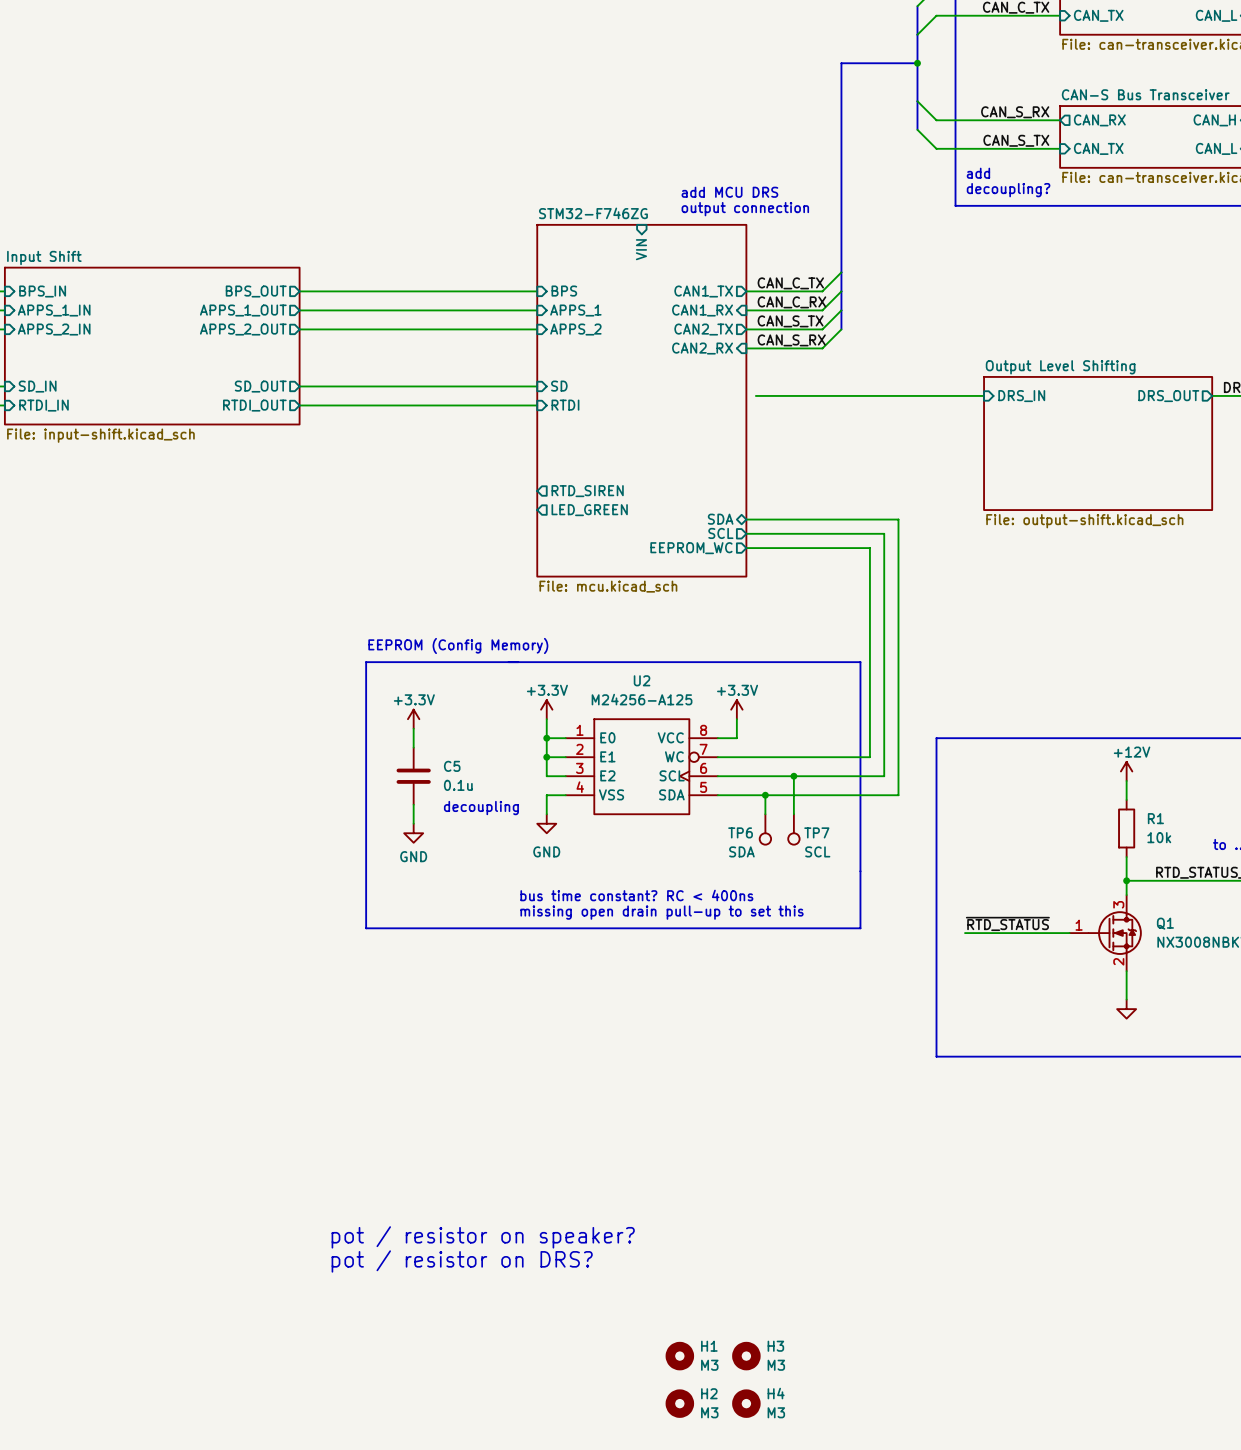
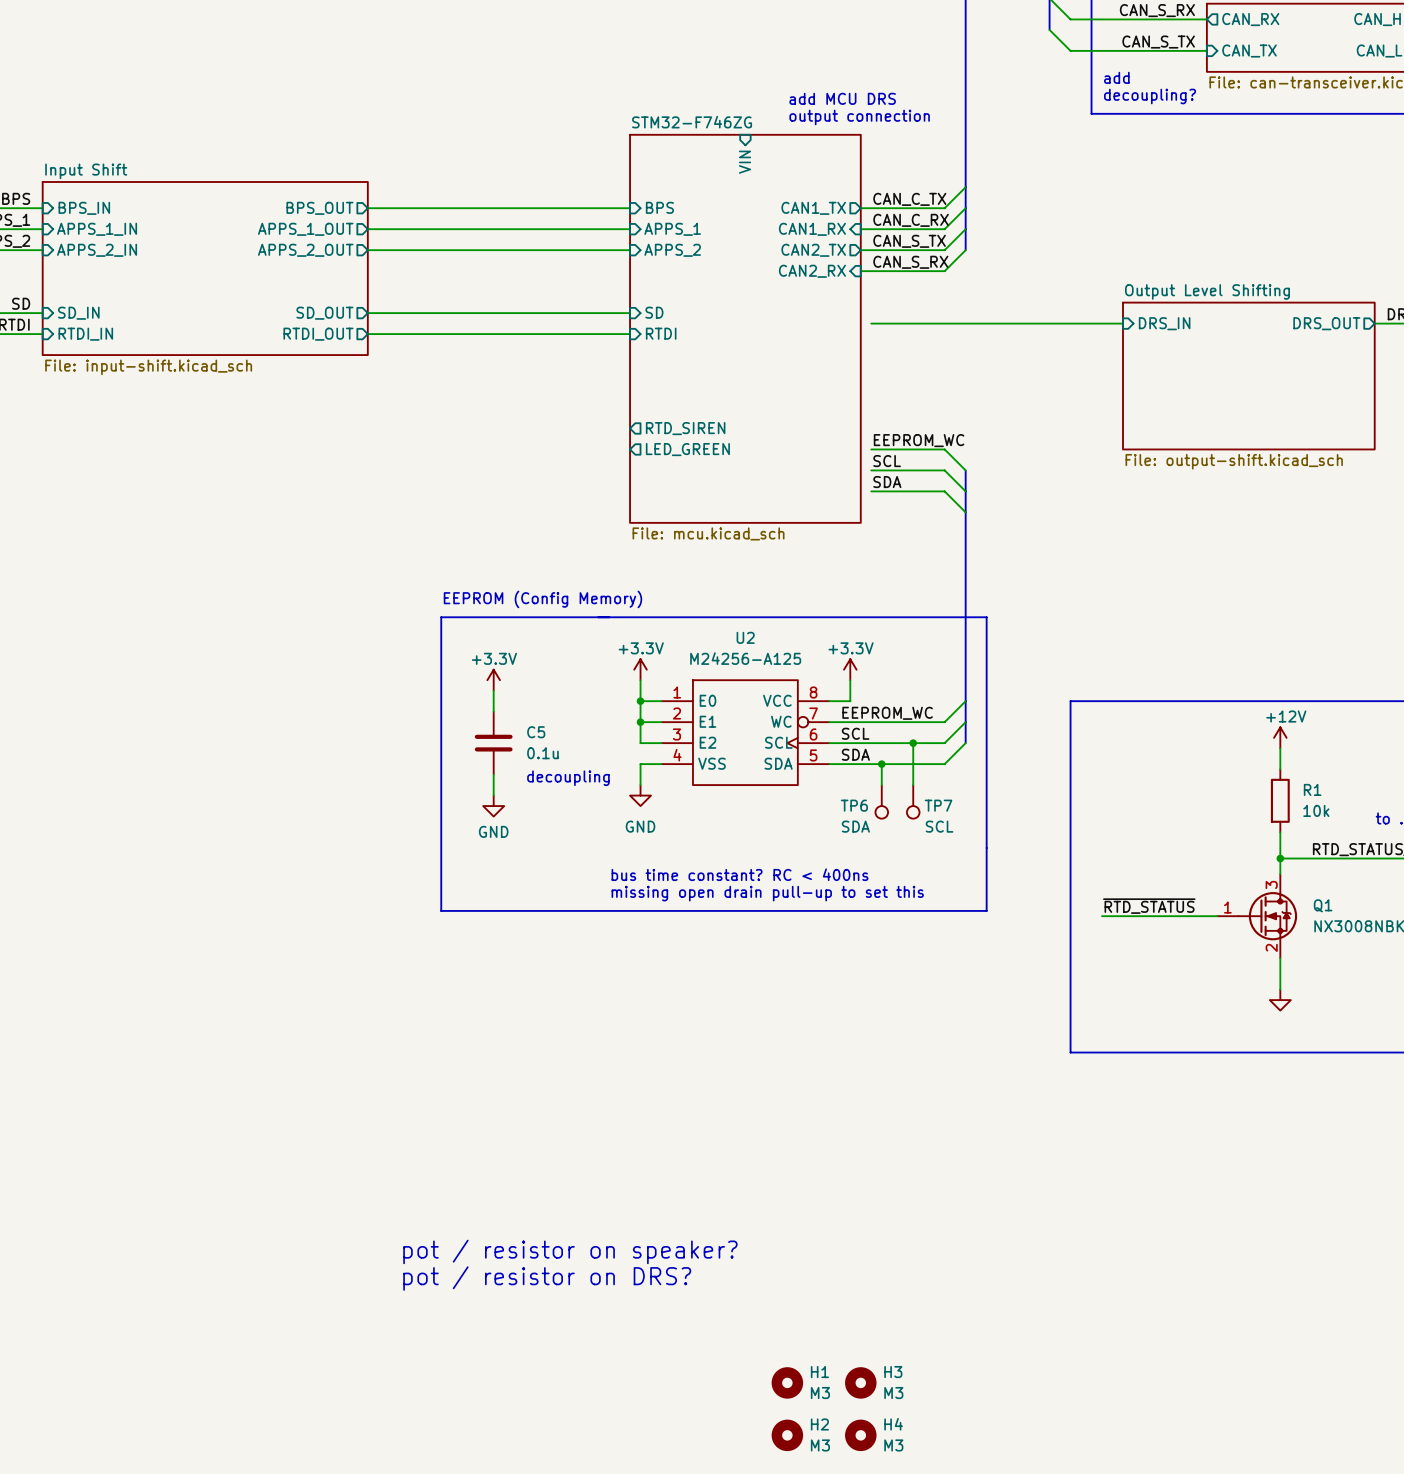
label: none -> EEPROM_WC (919, 440)
wire: none -> (871, 449) (944, 449) (965, 470)
sheet pin: SDA (720, 519) -> none
wire: (746, 519) (898, 519) (898, 795) (822, 795) -> (965, 743) (944, 764)
label: none -> SCL (887, 461)
wire: none -> (871, 470) (944, 470) (965, 491)
bus: none -> (965, 470) (965, 743)
sheet pin: SCL (720, 533) -> none
wire: (746, 533) (884, 533) (884, 776) (822, 776) -> (965, 722) (944, 743)
label: none -> SDA (887, 482)
sheet pin: EEPROM_WC (691, 548) -> none
wire: (746, 548) (755, 548) -> none
wire: (822, 548) (869, 548) (869, 757) (822, 757) -> (944, 491) (965, 512)
wire: none -> (965, 701) (944, 722)
label: none -> EEPROM_WC (887, 713)
label: none -> SCL (855, 733)
label: none -> SDA (855, 754)

